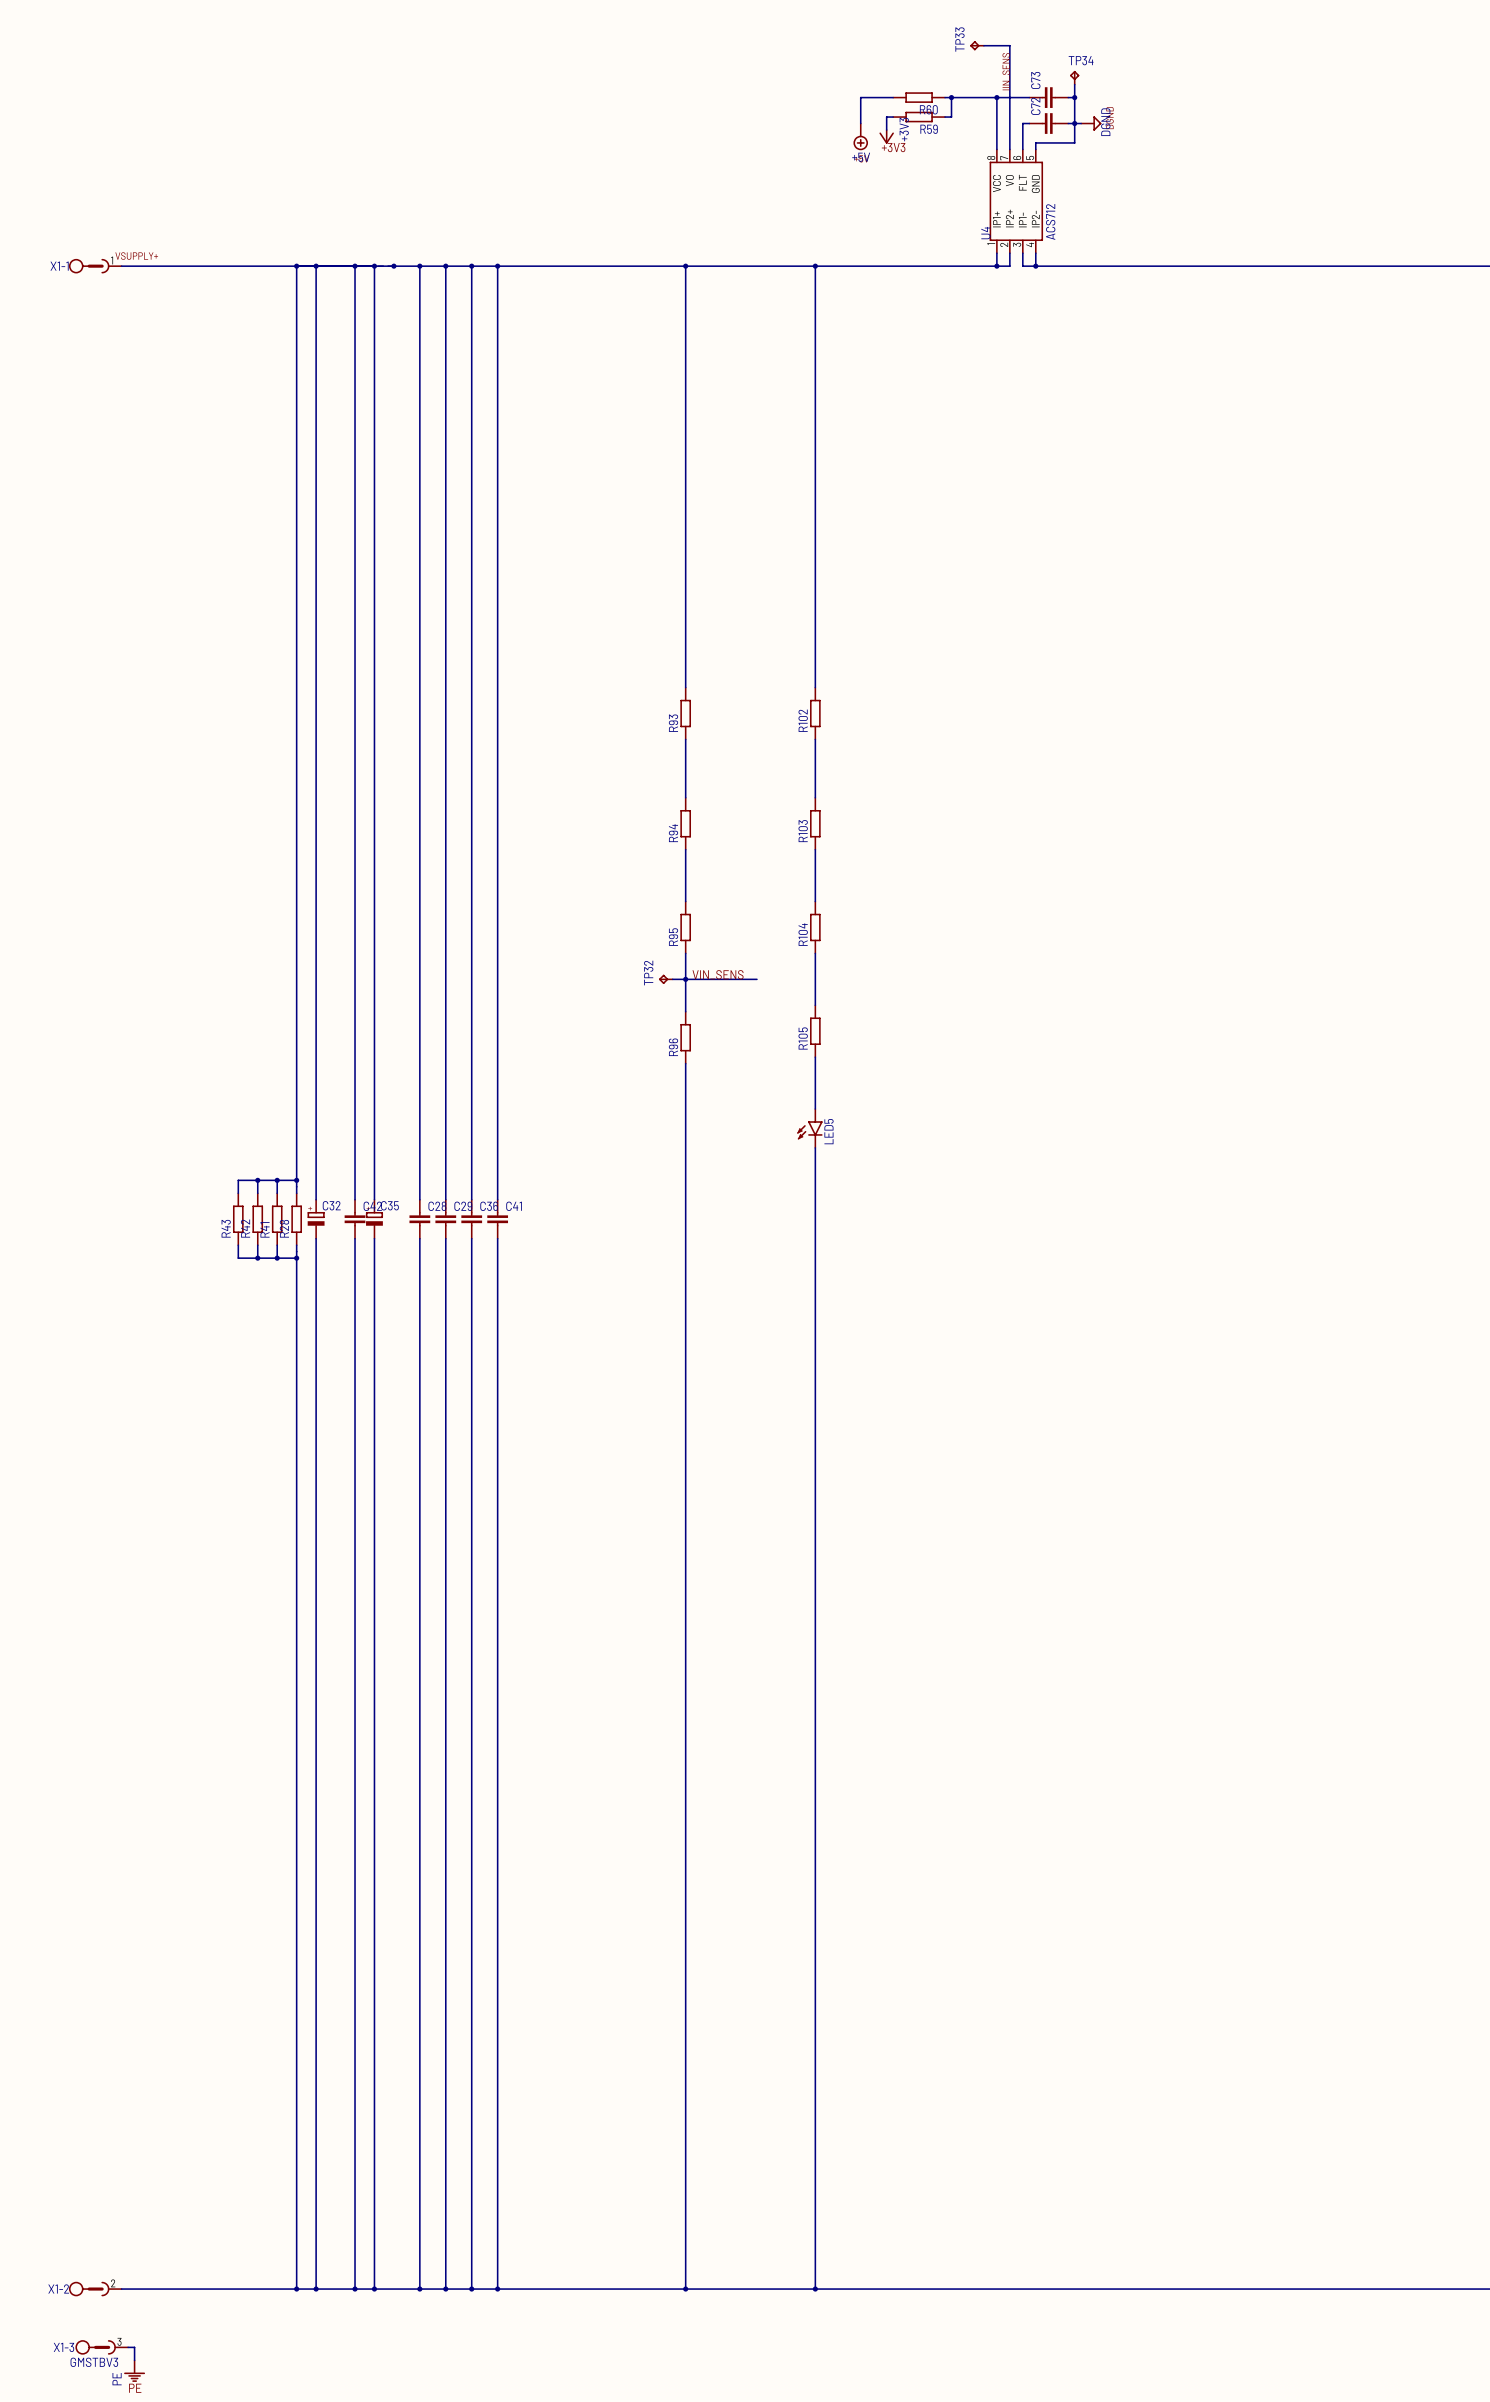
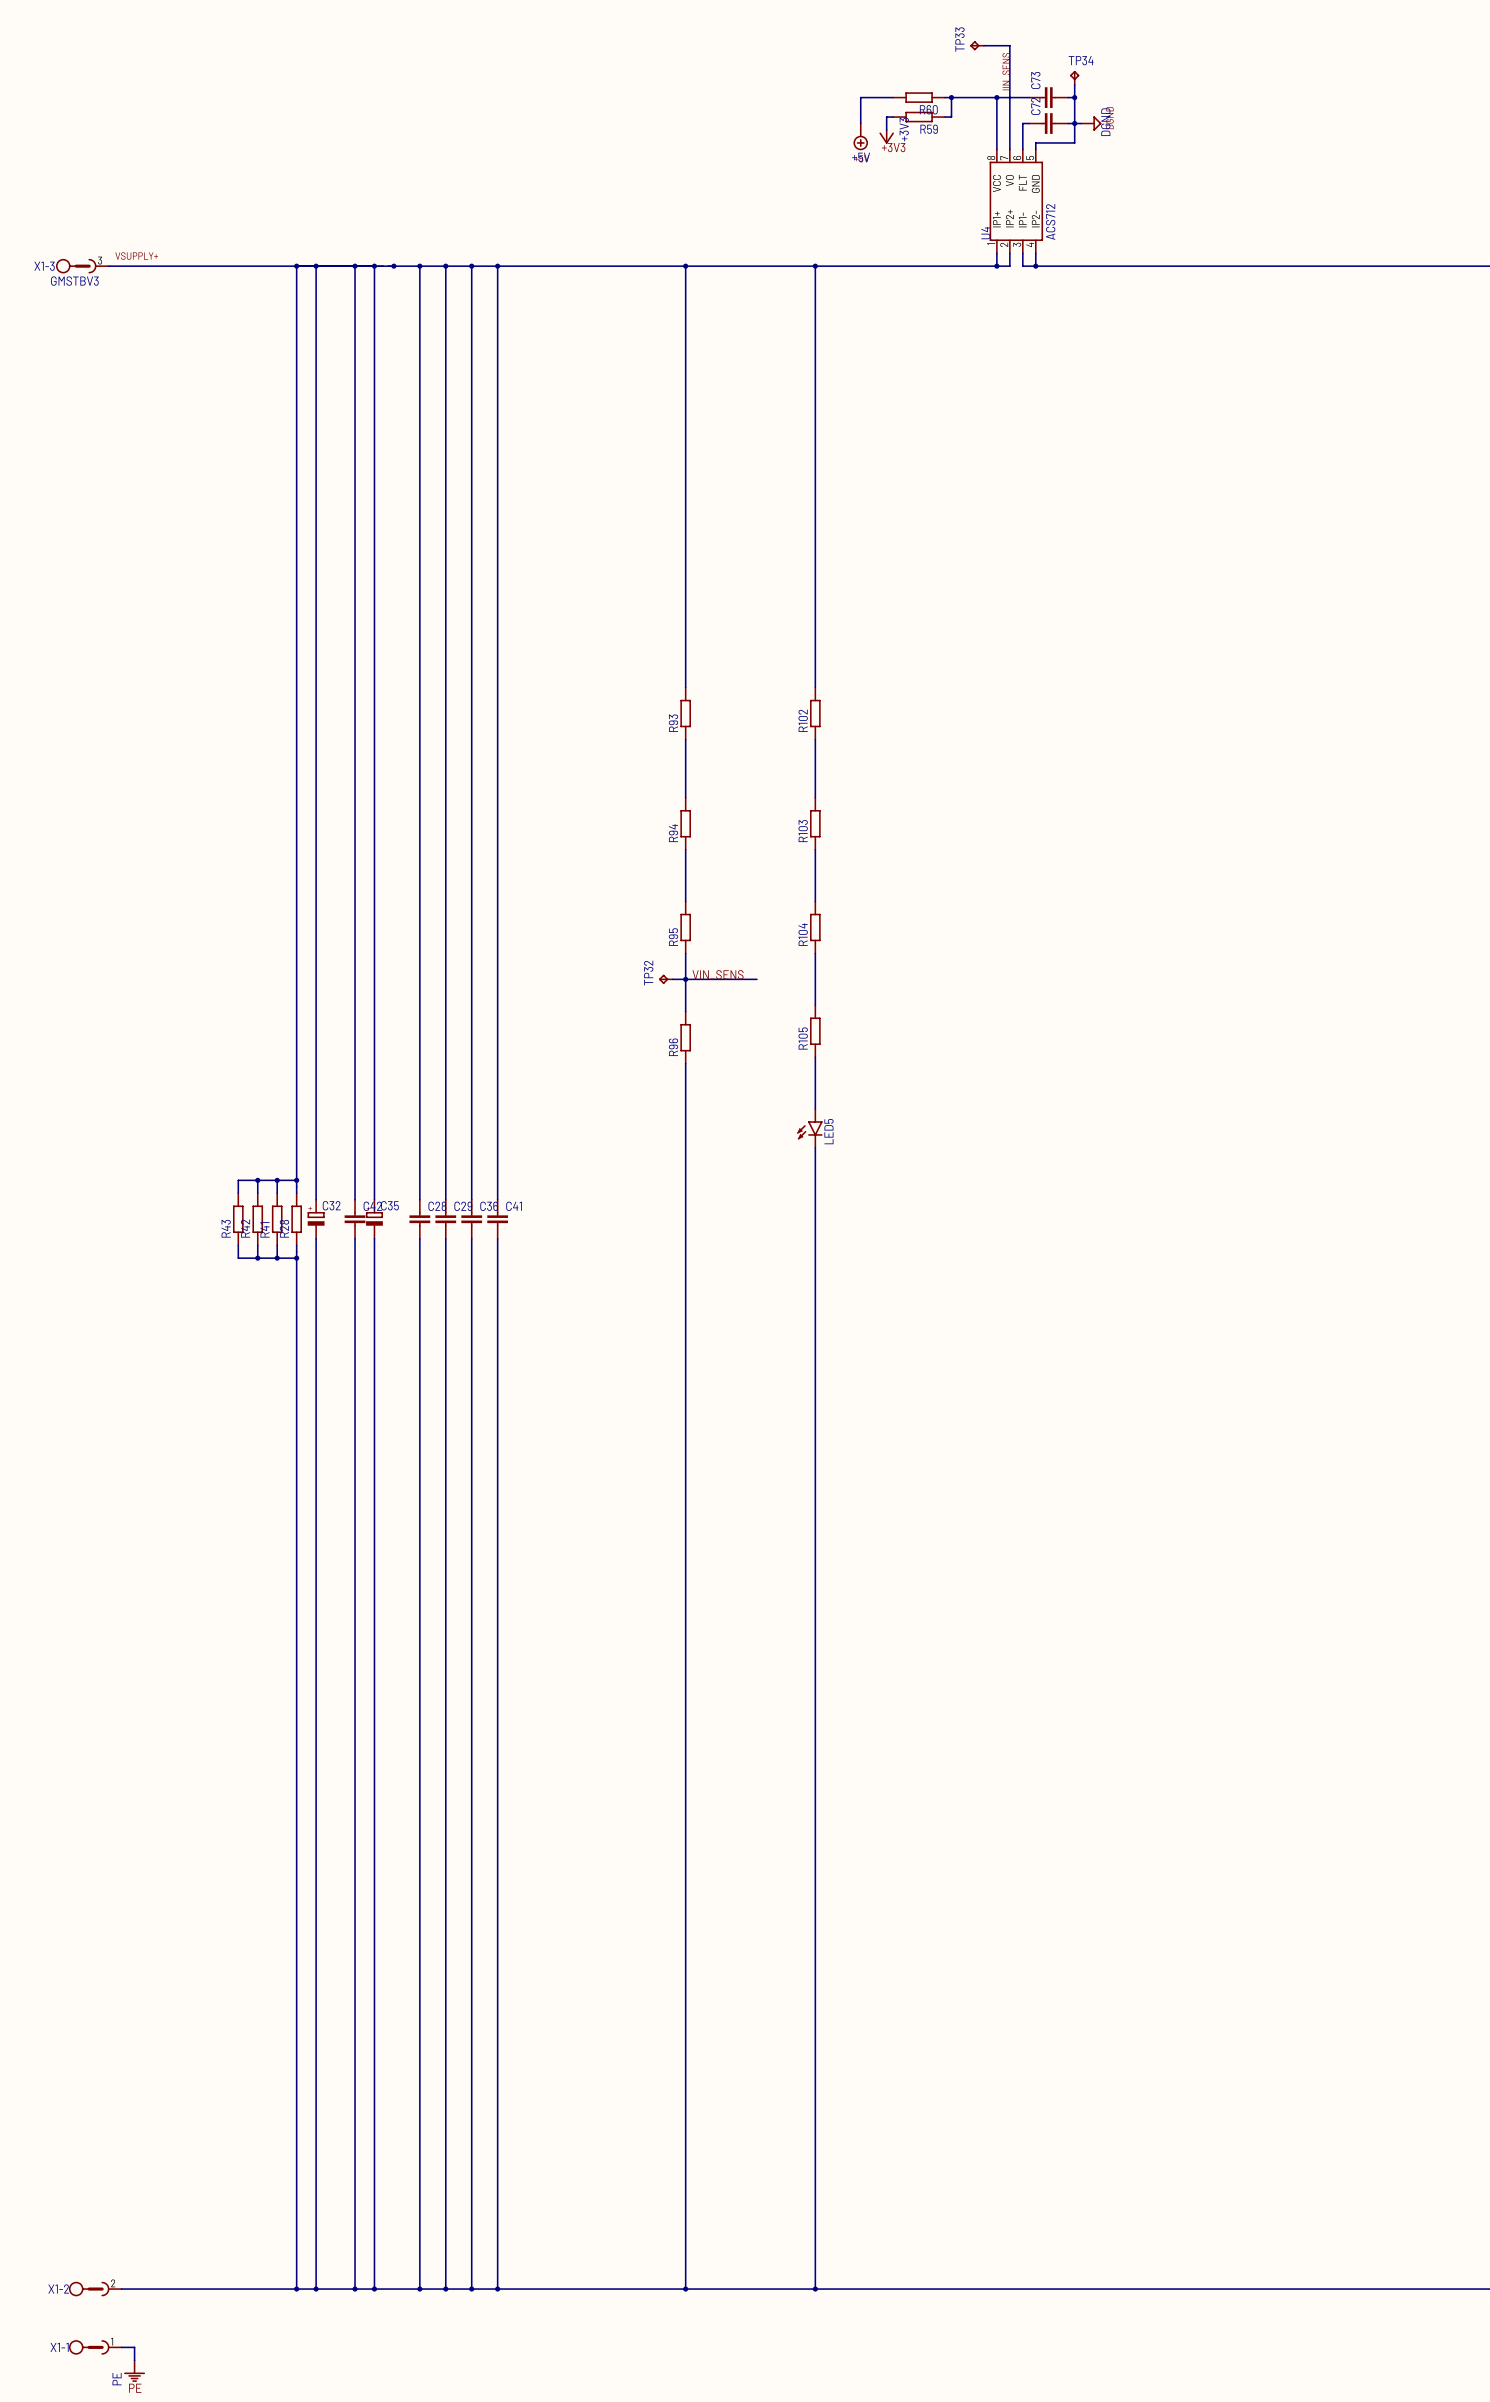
X1-1 position: (95, 266) -> (95, 2347)
X1-3 position: (101, 2347) -> (82, 266)

